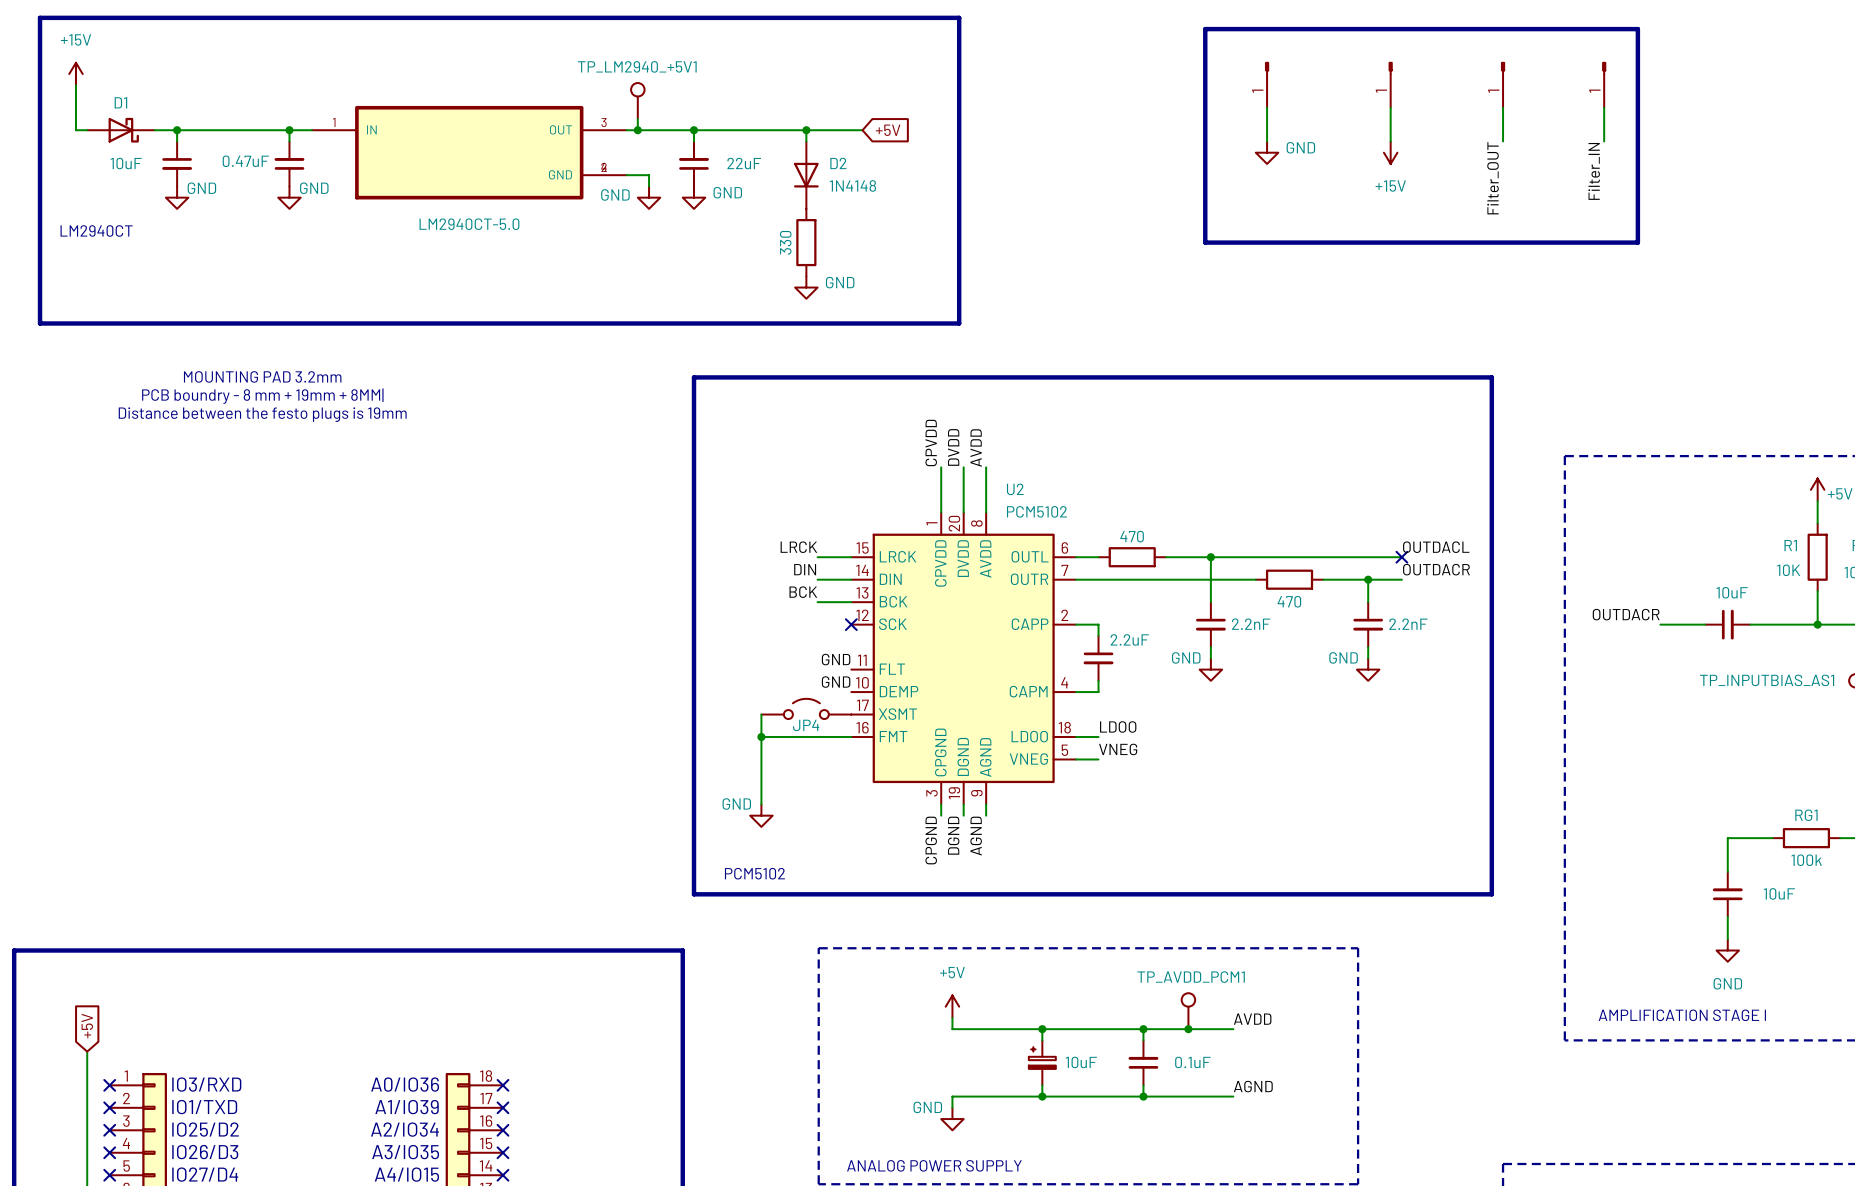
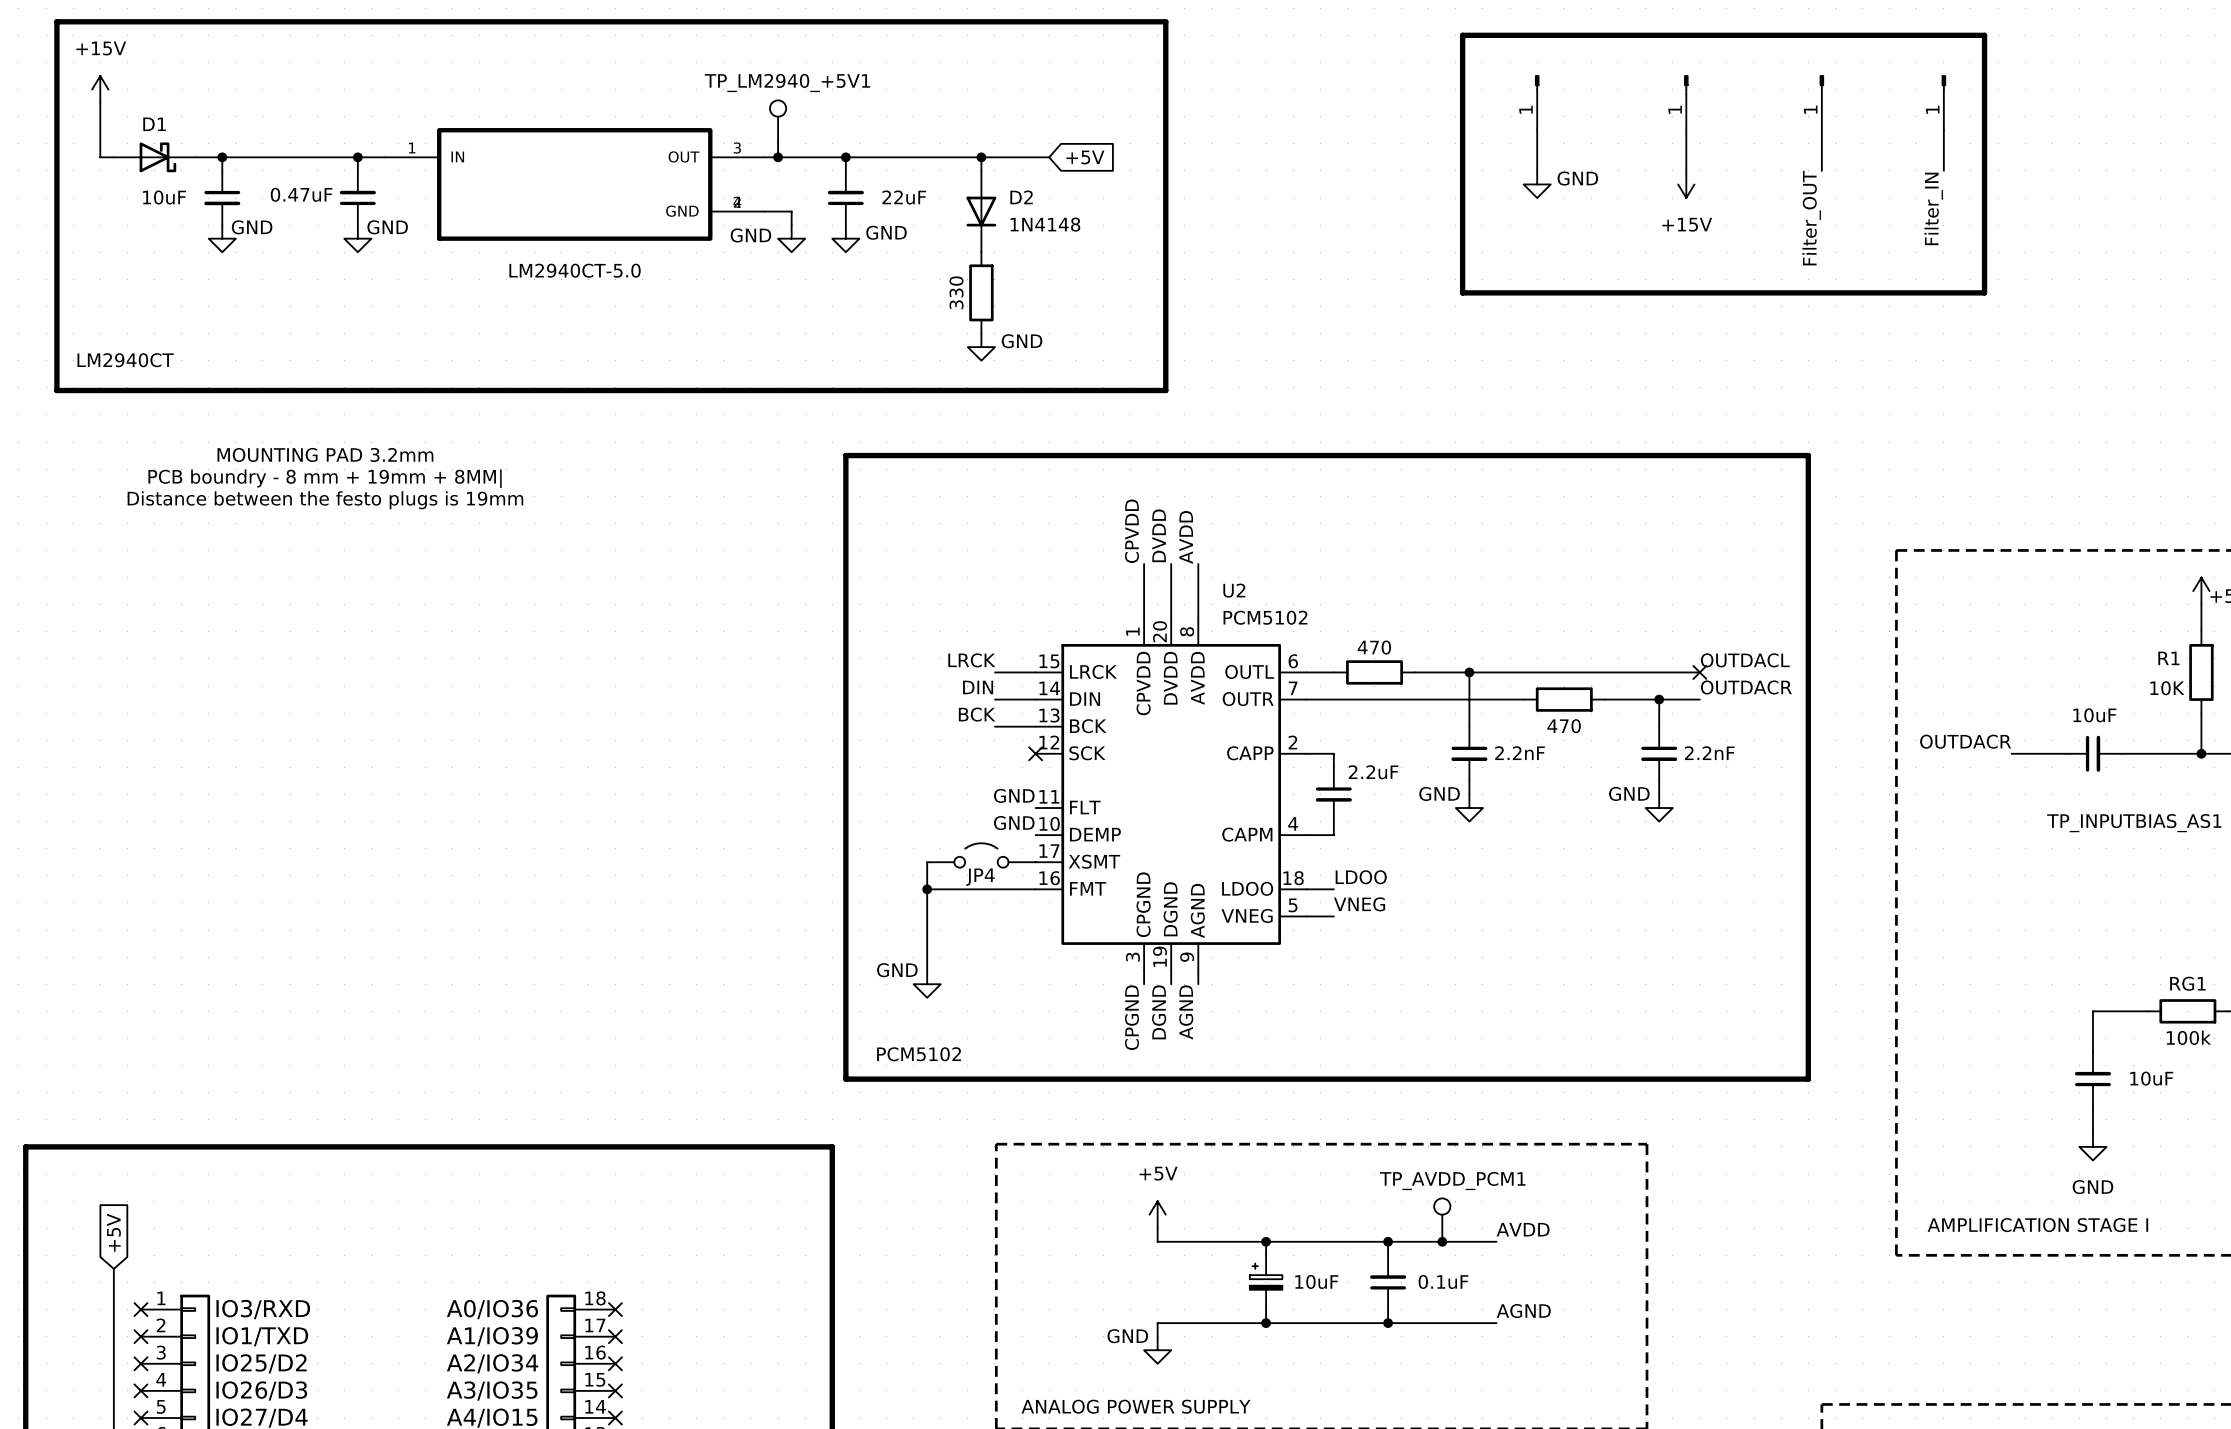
text position: LM2940CT (96, 230) -> LM2940CT (125, 360)

